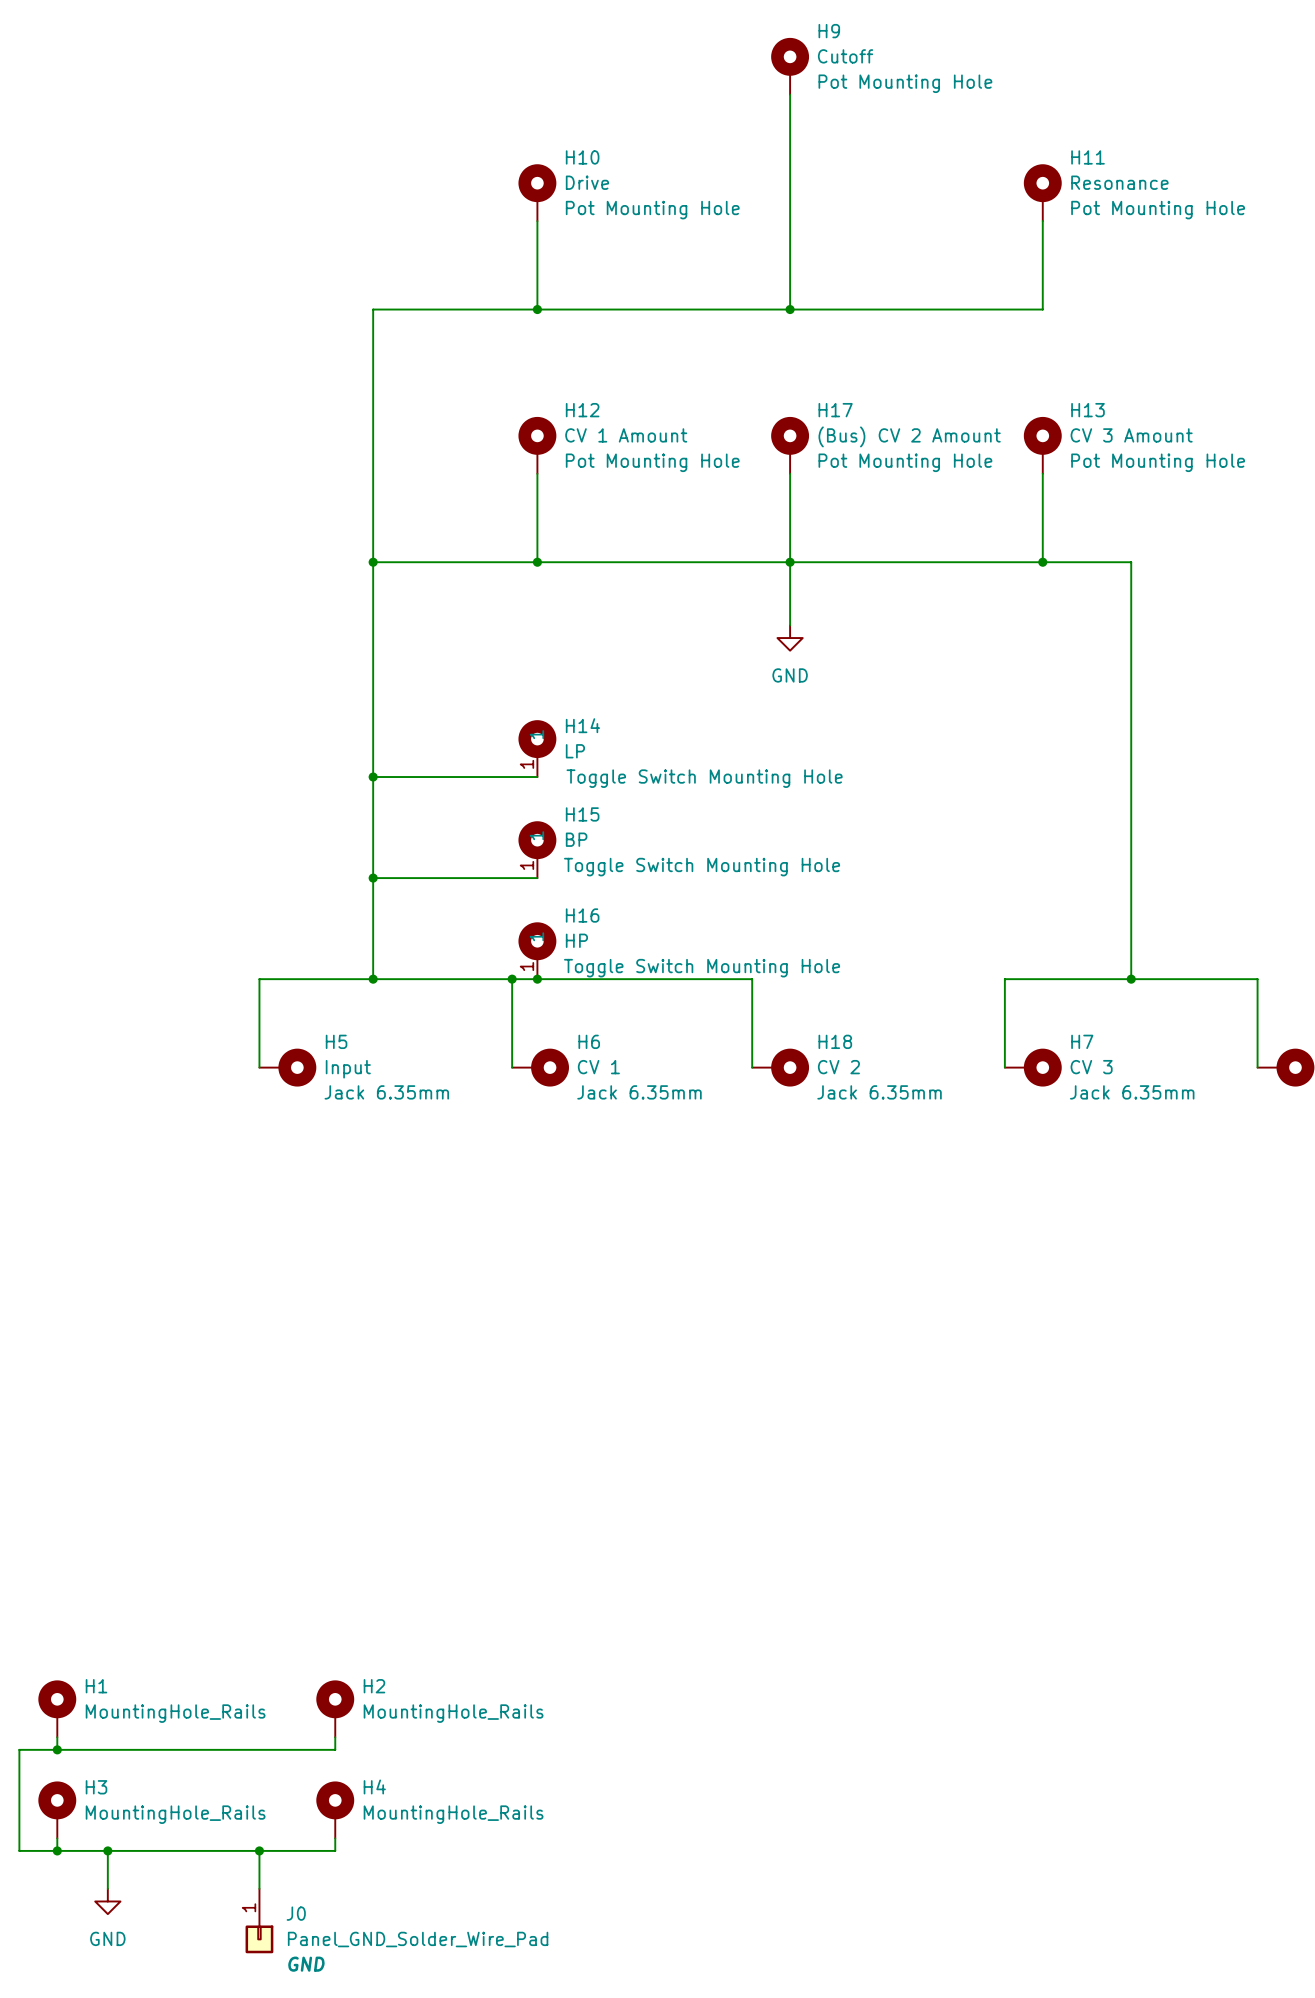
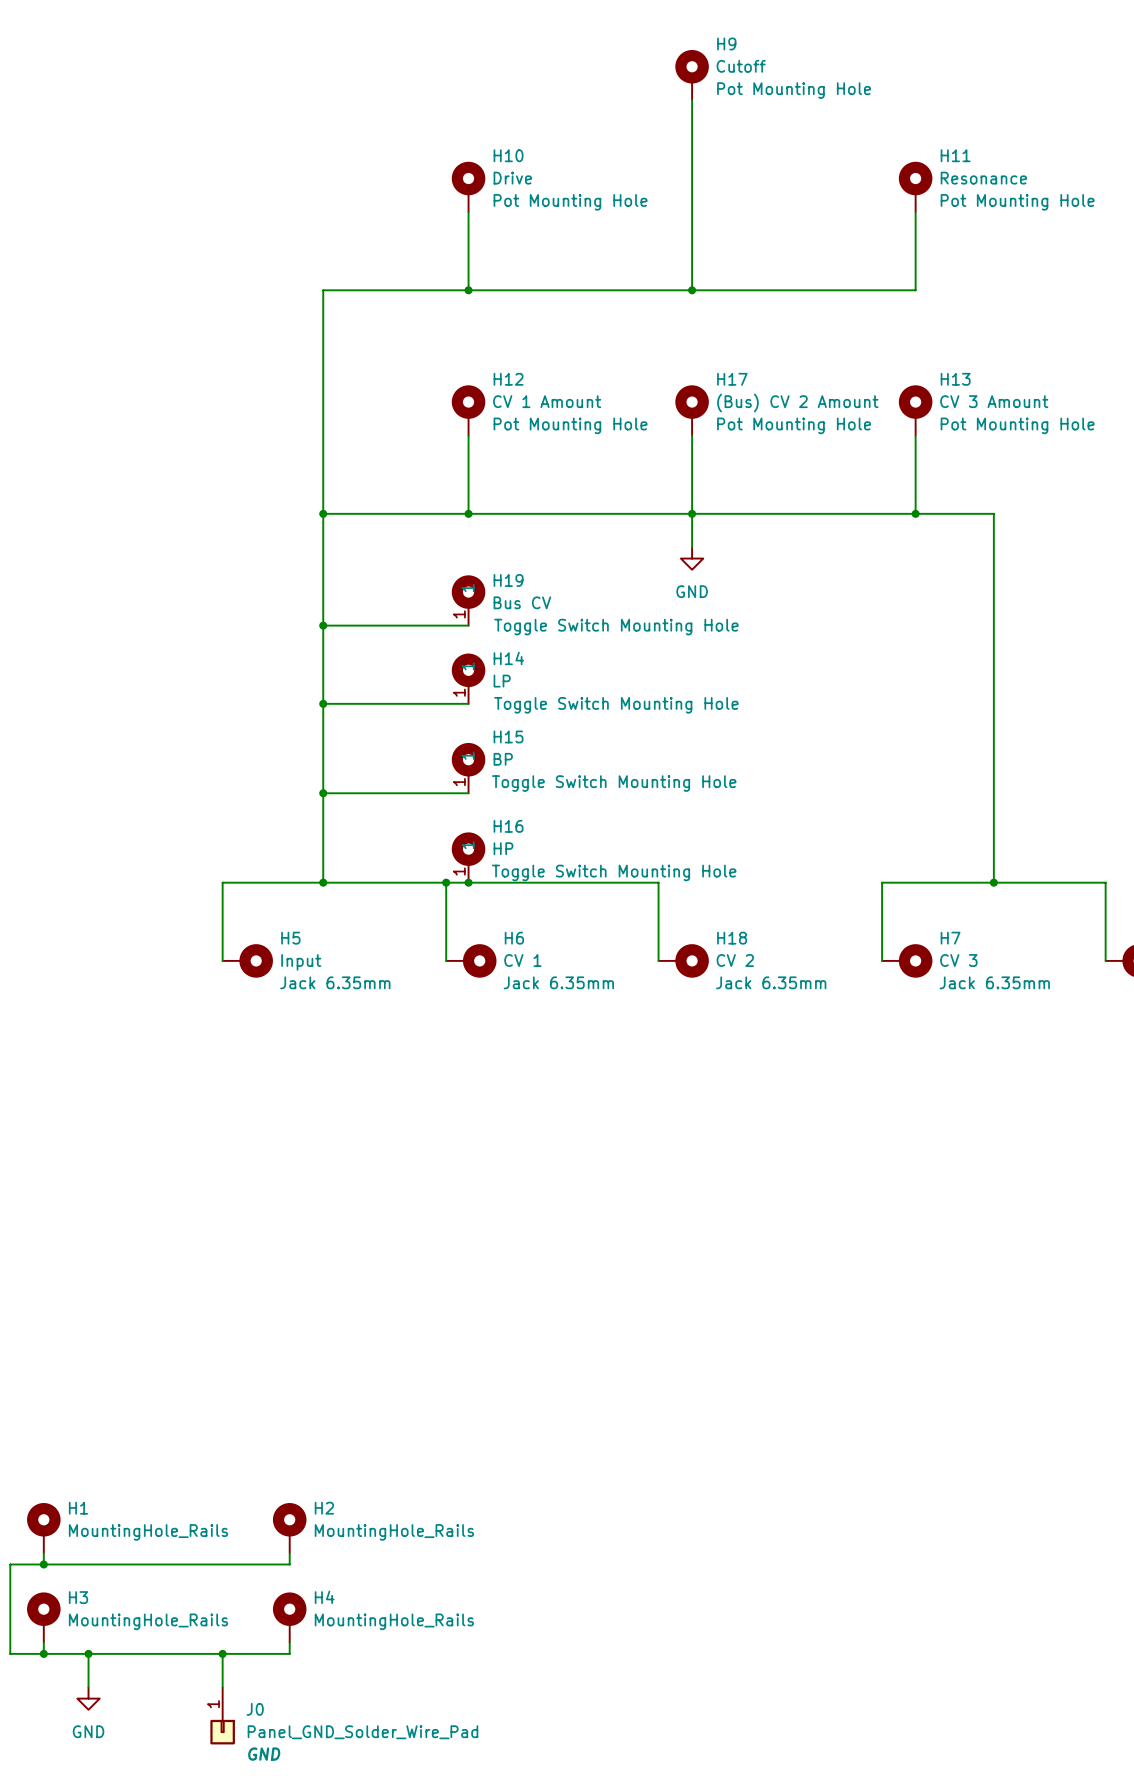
power symbol position: GND (790, 638) -> GND (692, 558)
H19: none -> Bus CV (468, 600)
wire: none -> (323, 625) (468, 625)
junction: none -> (323, 625)

